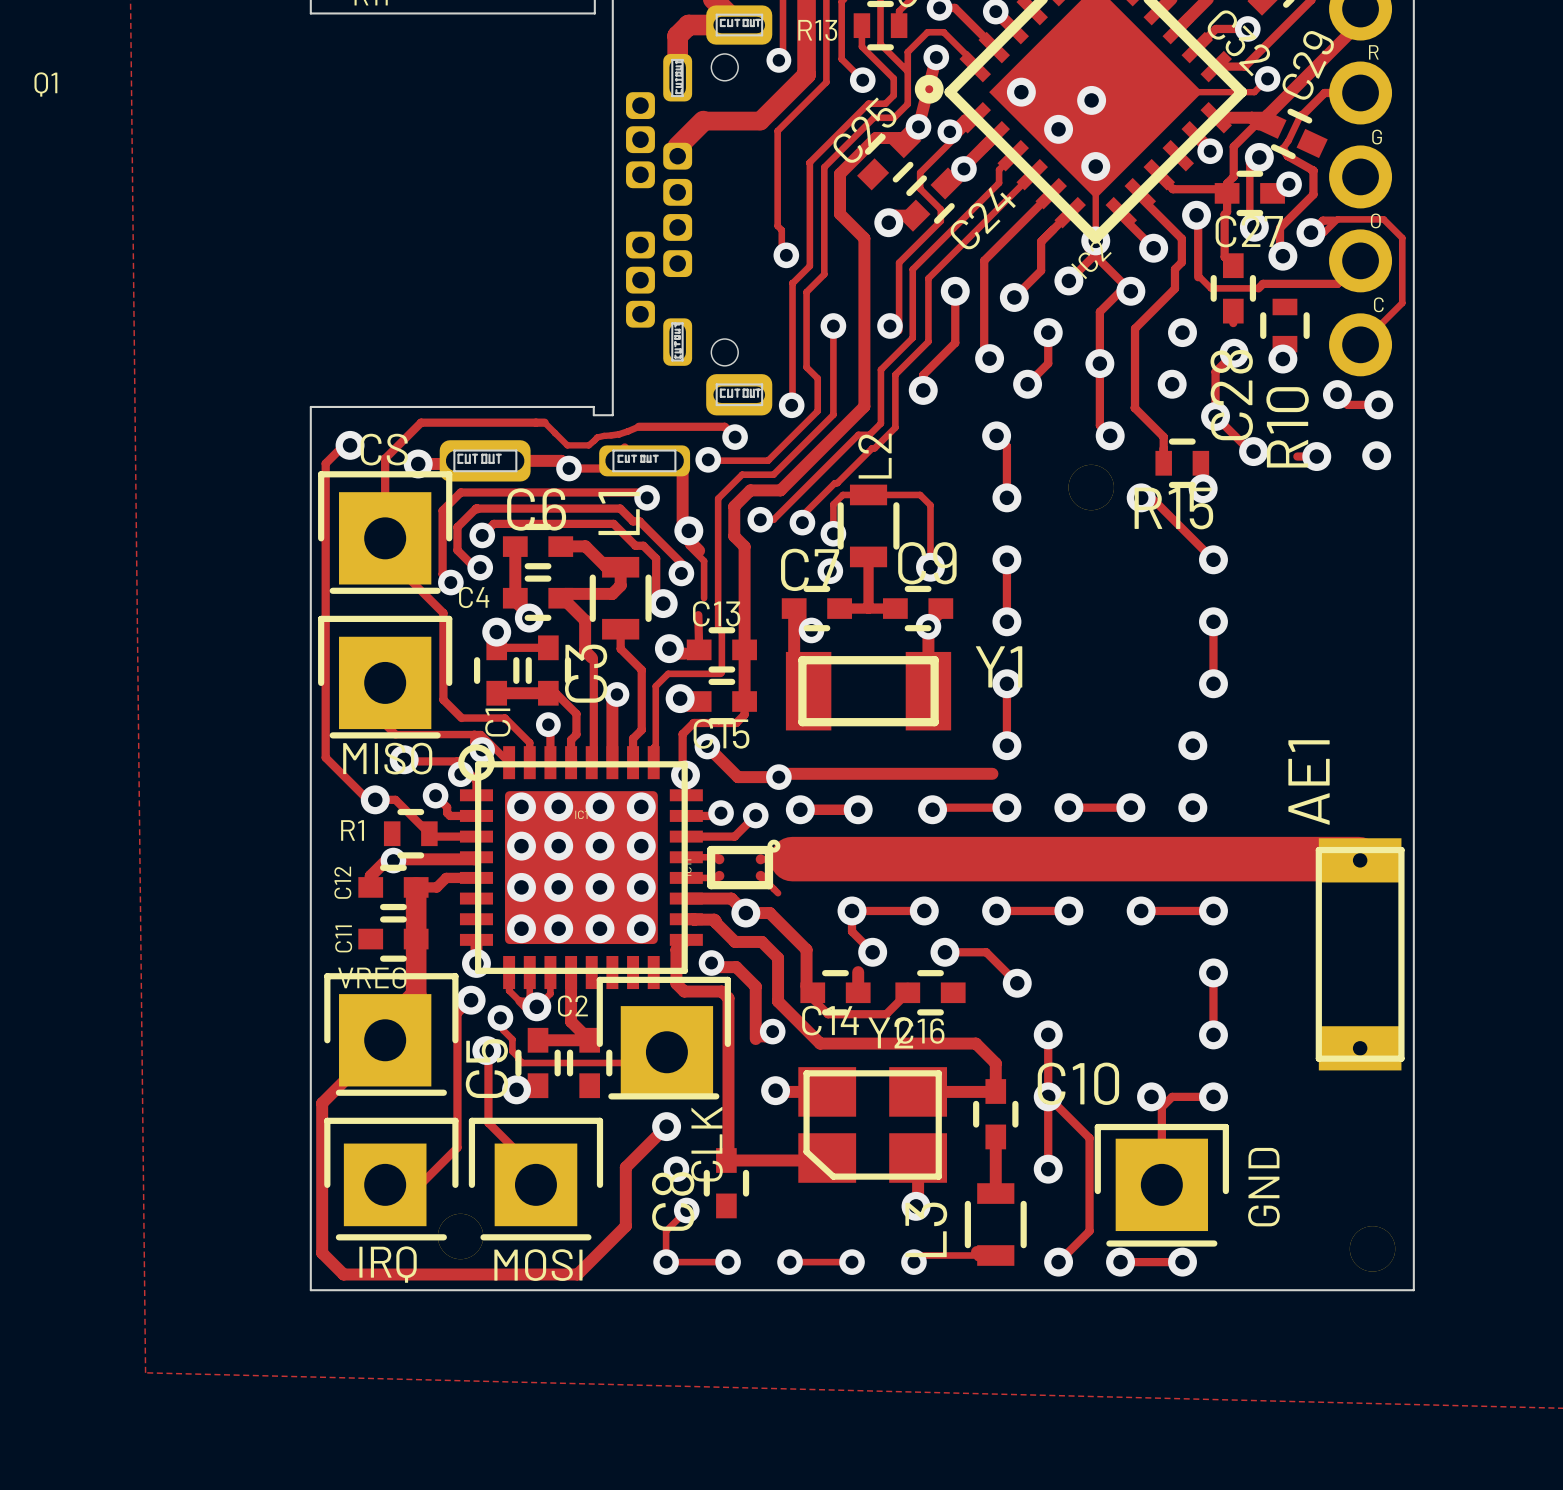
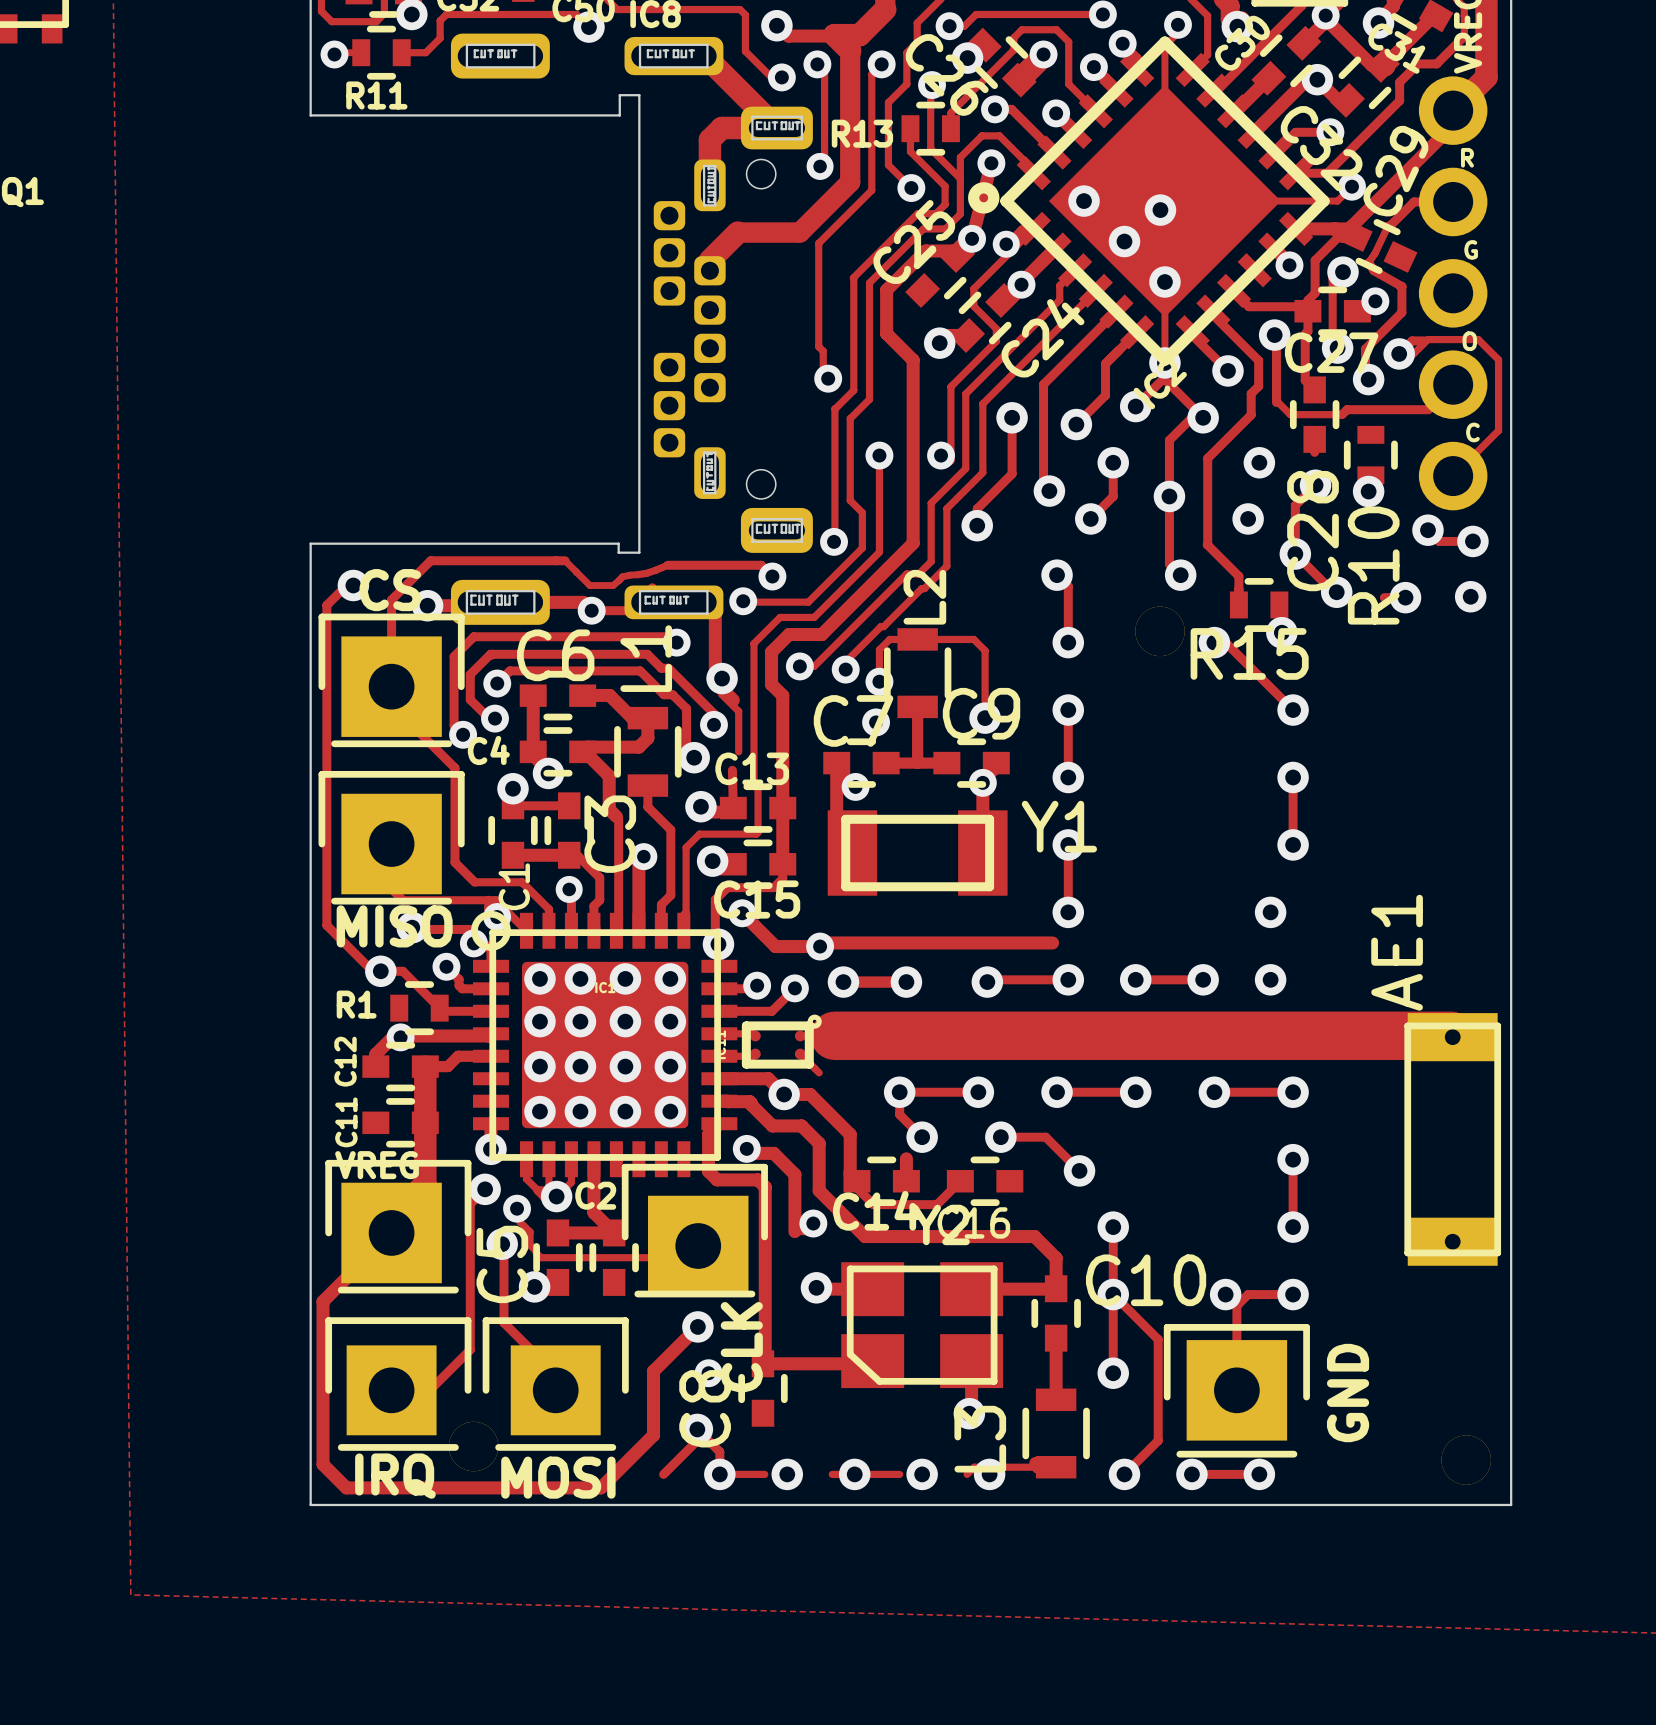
track: (686, 1210) (666, 1231) (666, 1262) (686, 1262) -> (663, 1474) (697, 1440) (697, 1429) (719, 1451) (719, 1474)
via position: (686, 1210) -> (697, 1429)
via position: (666, 1262) -> (719, 1474)
via position: (728, 1262) -> (787, 1474)
via position: (790, 1262) -> (854, 1474)
via position: (852, 1262) -> (922, 1474)
via position: (913, 1262) -> (989, 1474)

